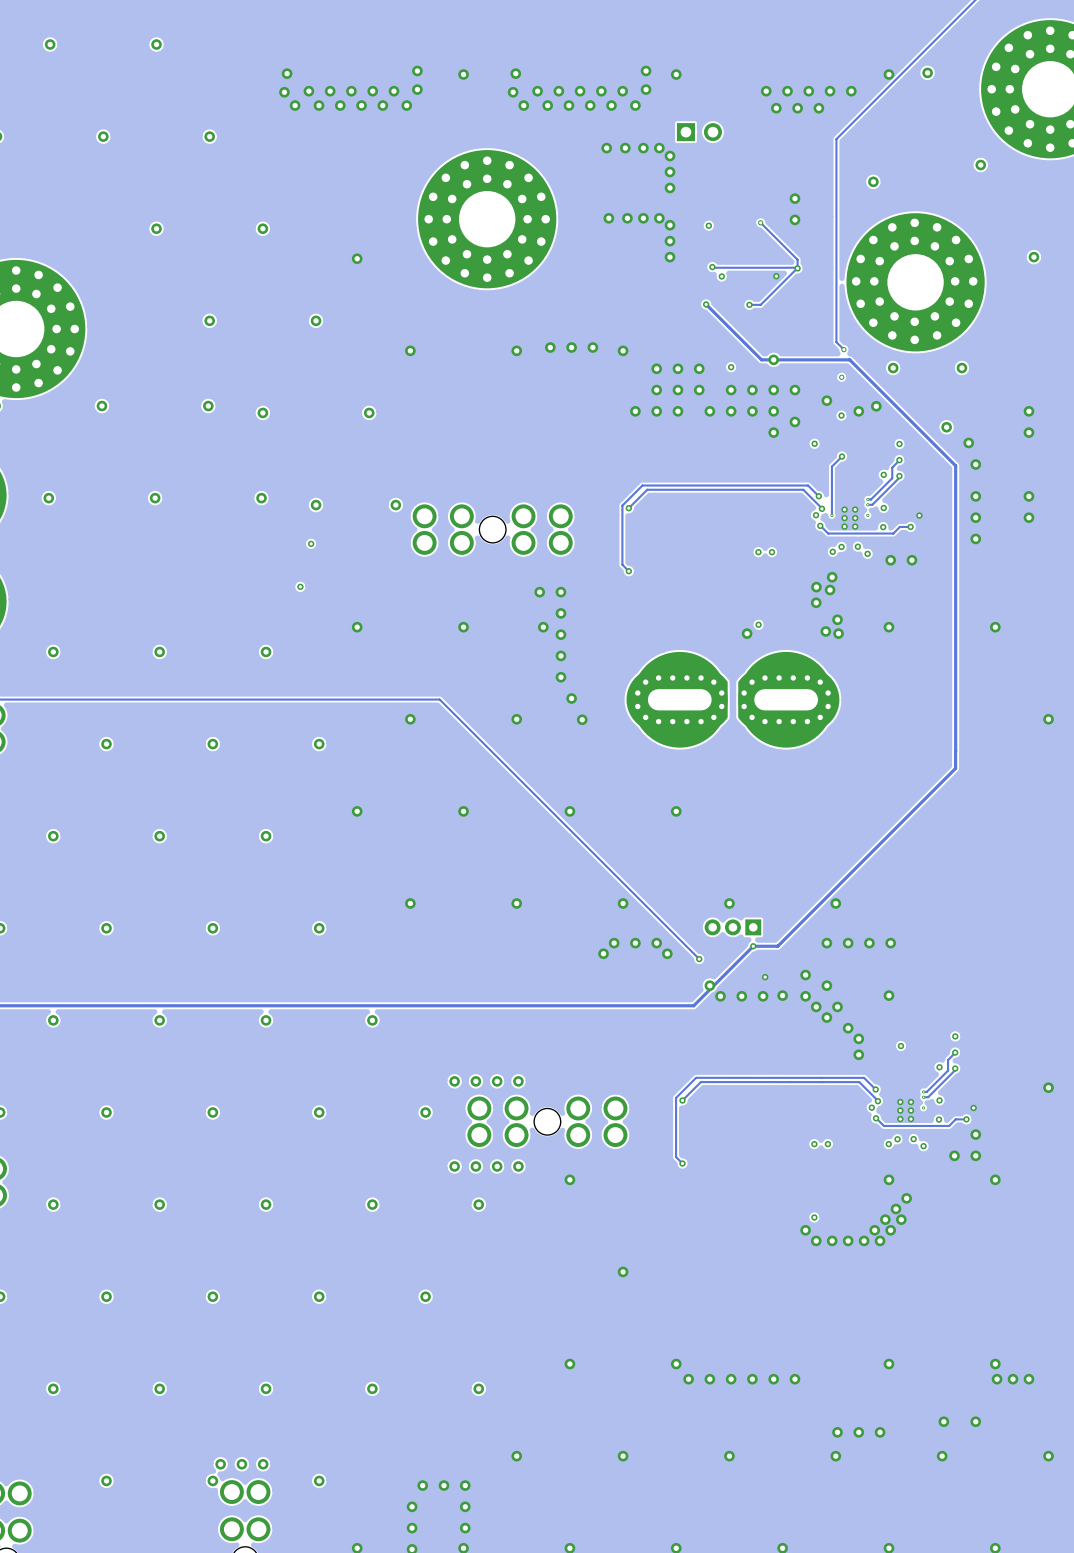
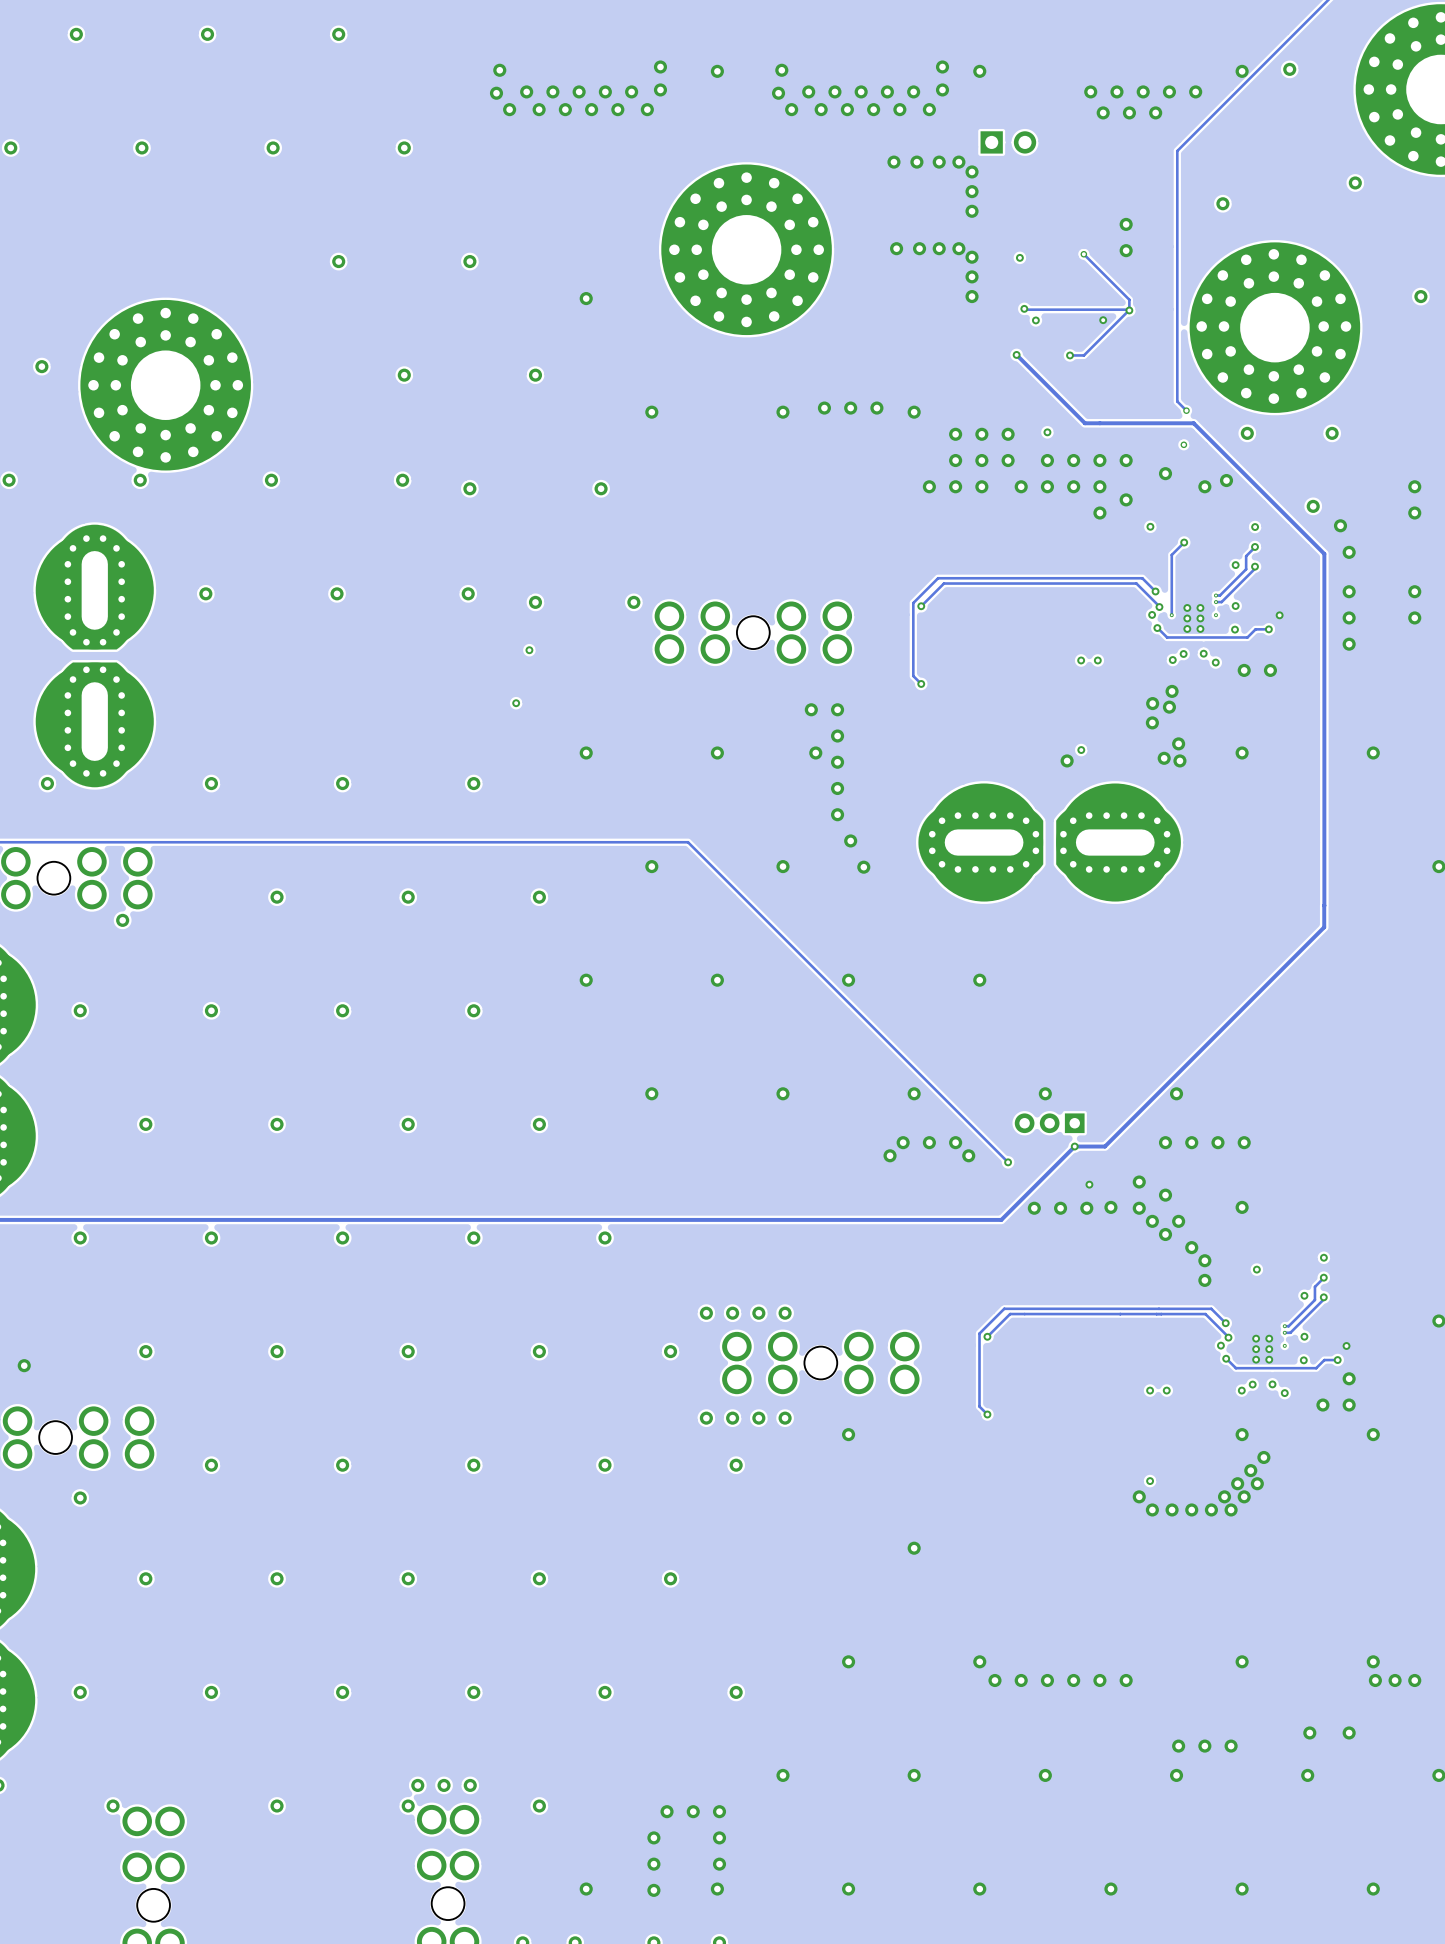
via: (773, 359) -> none
via: (841, 415) -> none
via: (709, 985) -> none

